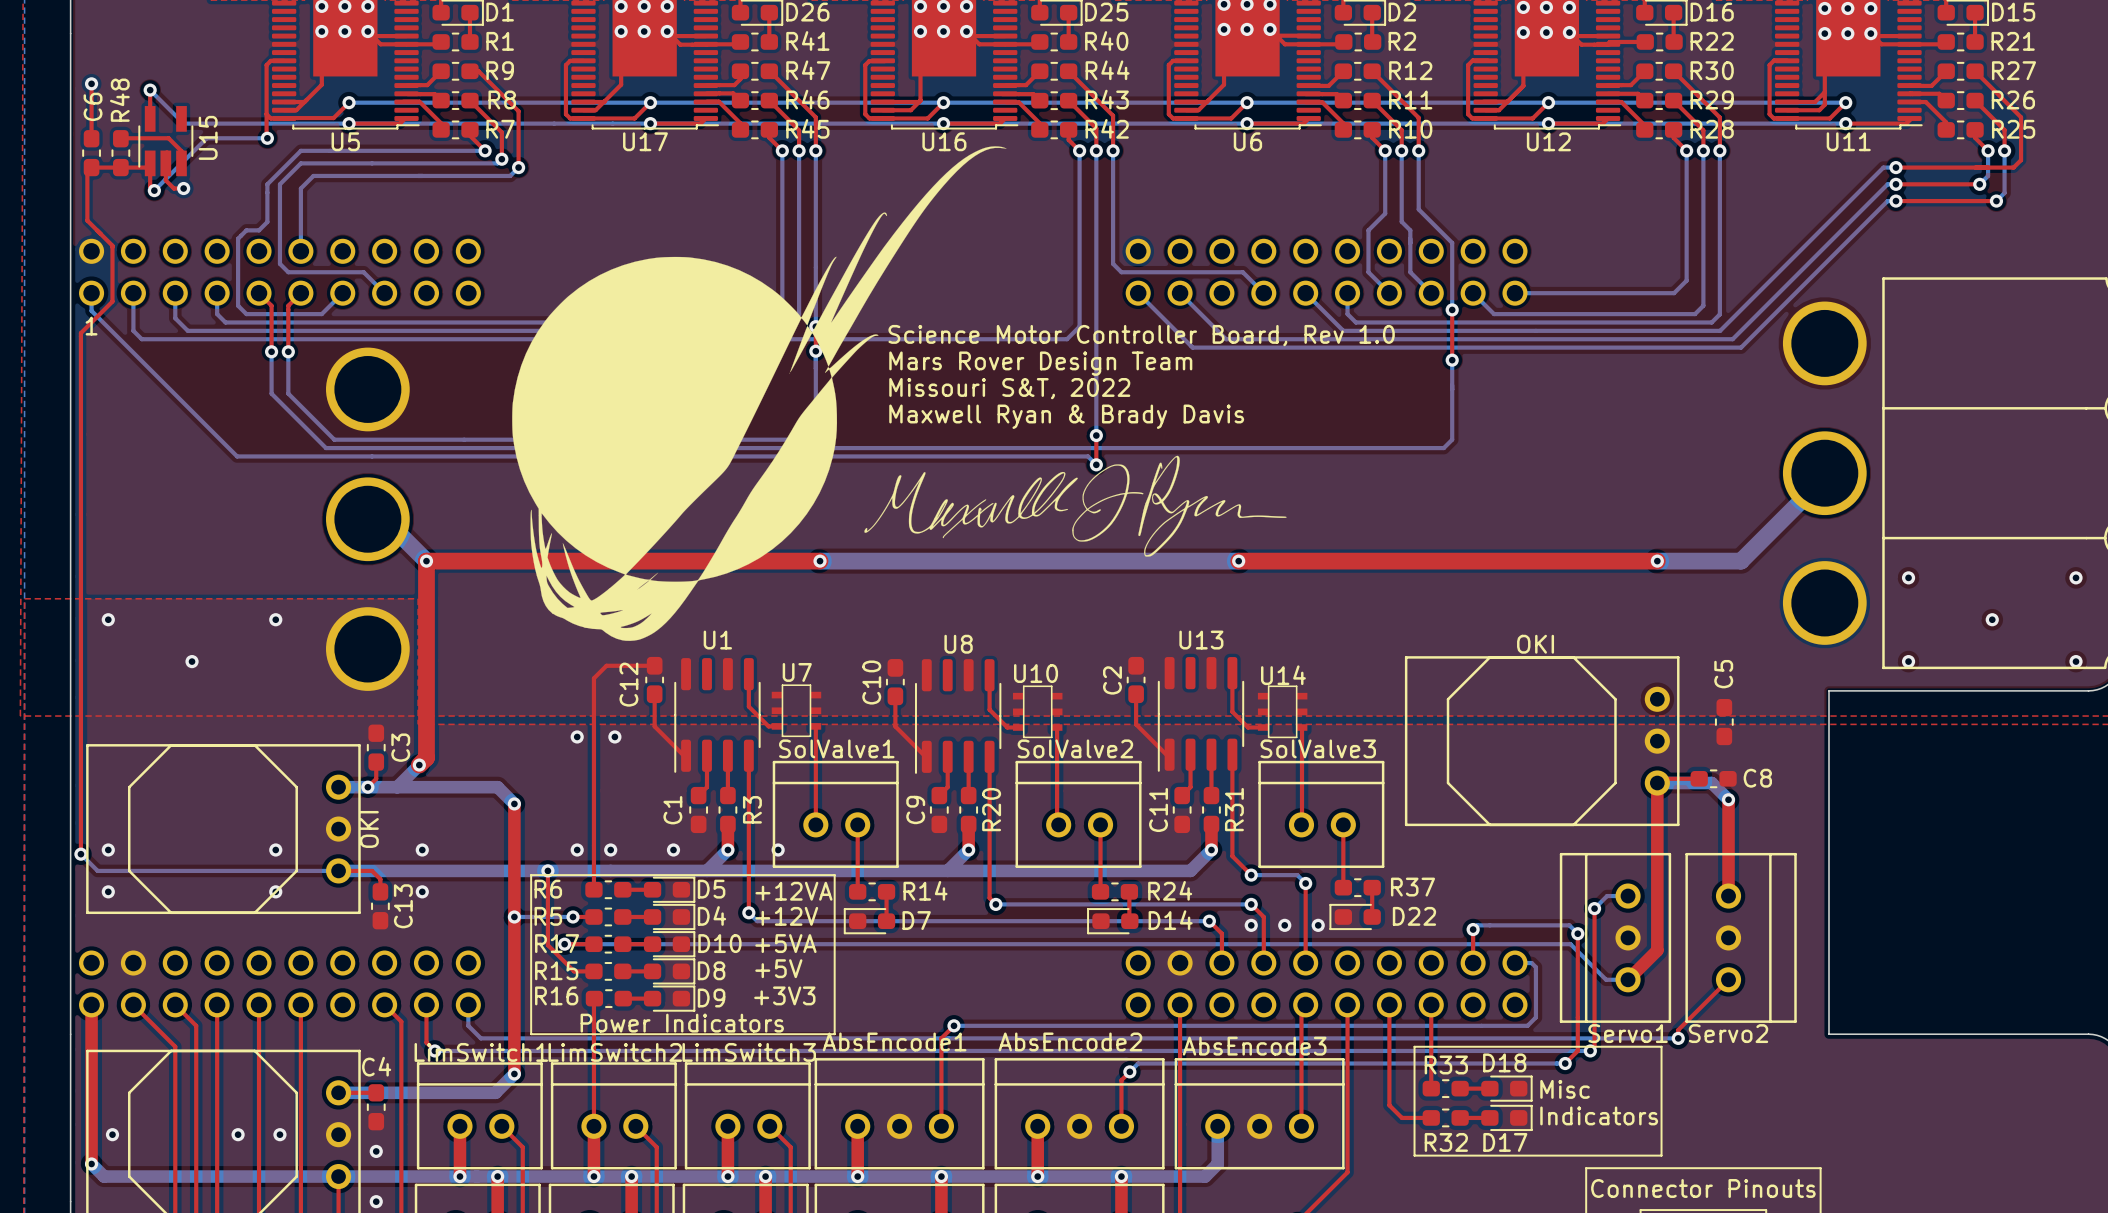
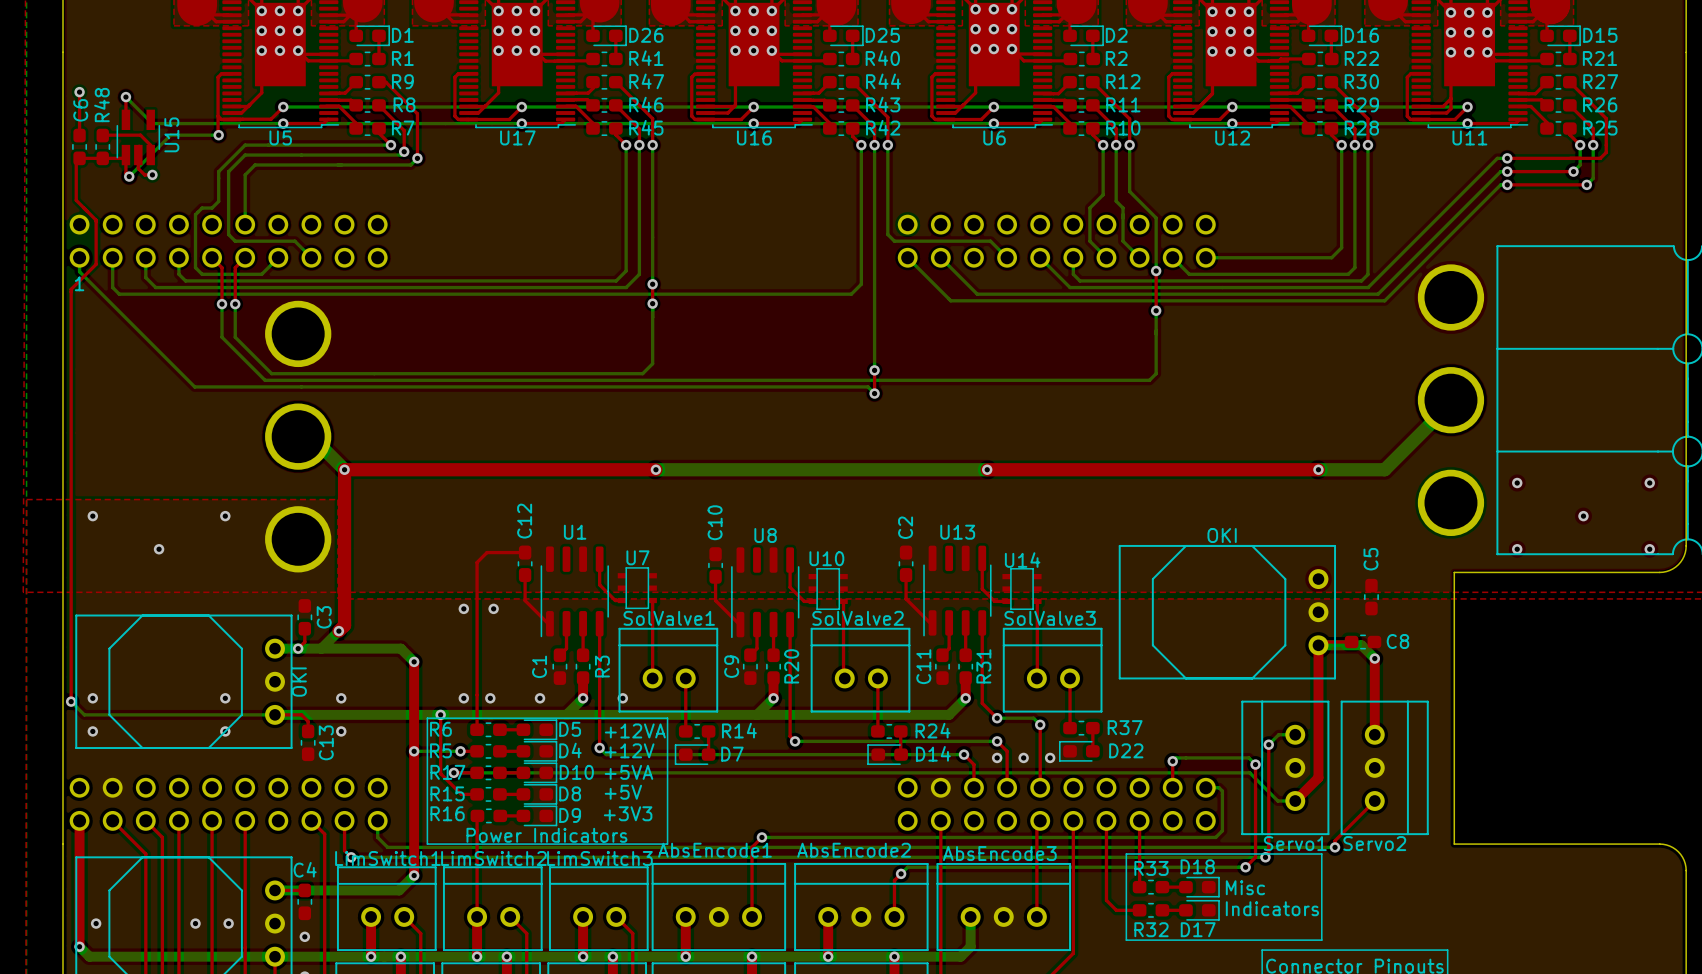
drawing: [512, 146, 1287, 641] -> none
text: Science Motor Controller Board, Rev 1.0 (1141, 335) -> none
text: Mars Rover Design Team (1040, 363) -> none
text: Missouri S&T, 2022 (1009, 388) -> none
text: Maxwell Ryan & Brady Davis (1066, 416) -> none
C2 name position: C2 (1112, 680) -> C2 (905, 527)
C10 name position: C10 (871, 682) -> C10 (715, 522)
C12 name position: C12 (628, 684) -> C12 (524, 521)

